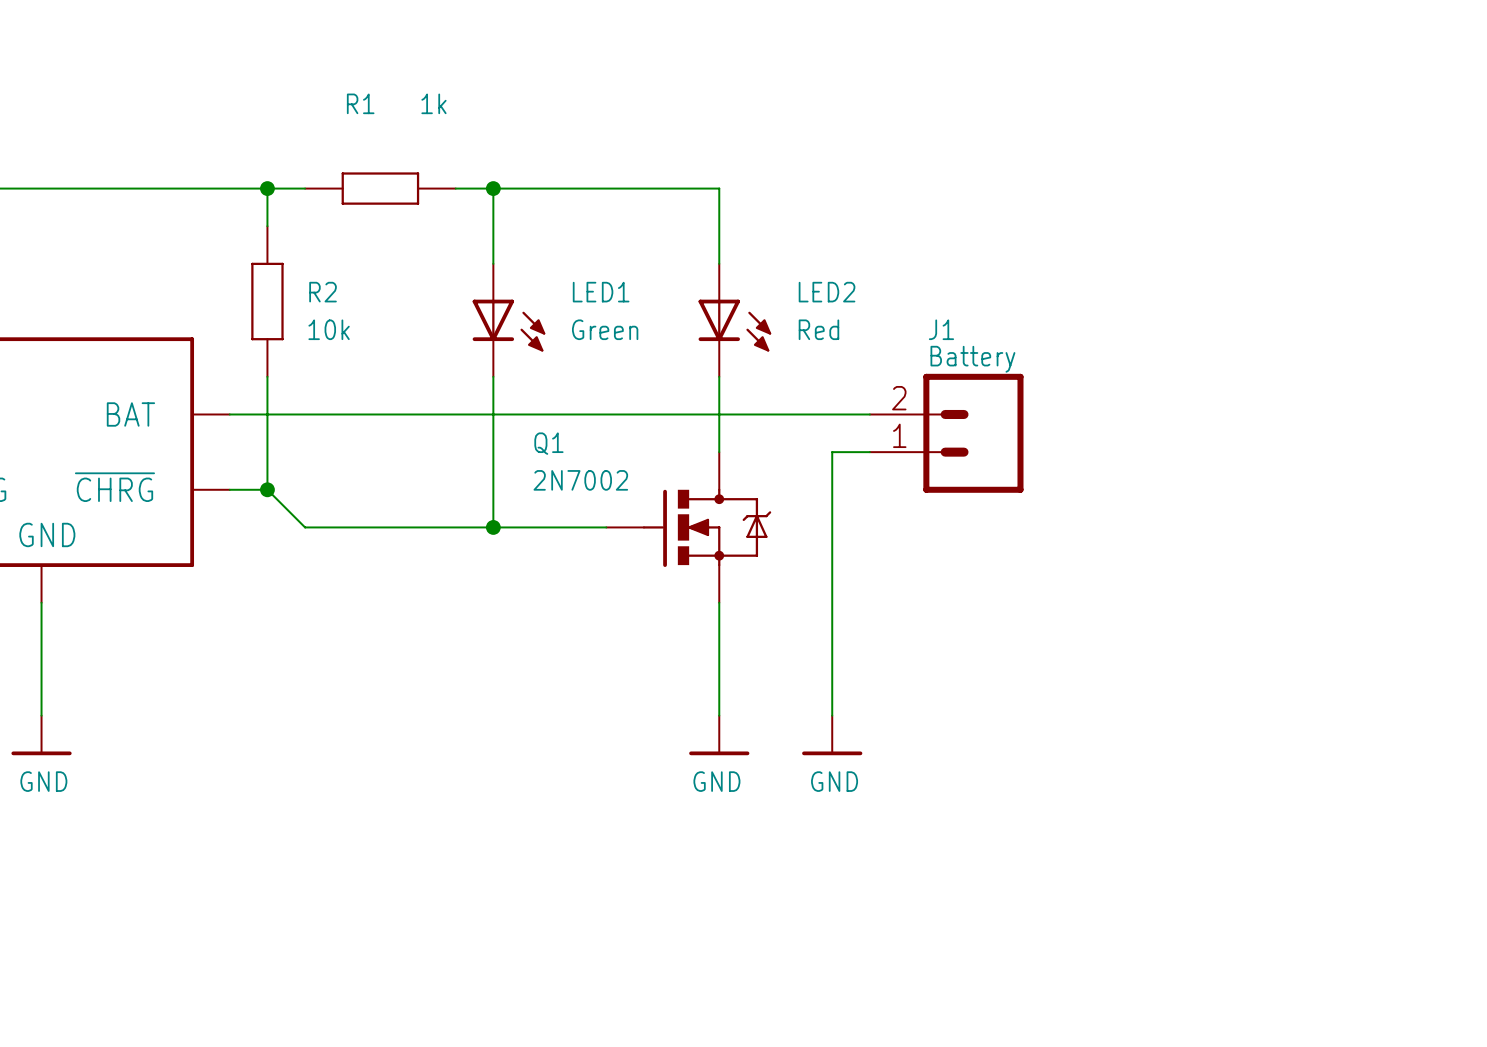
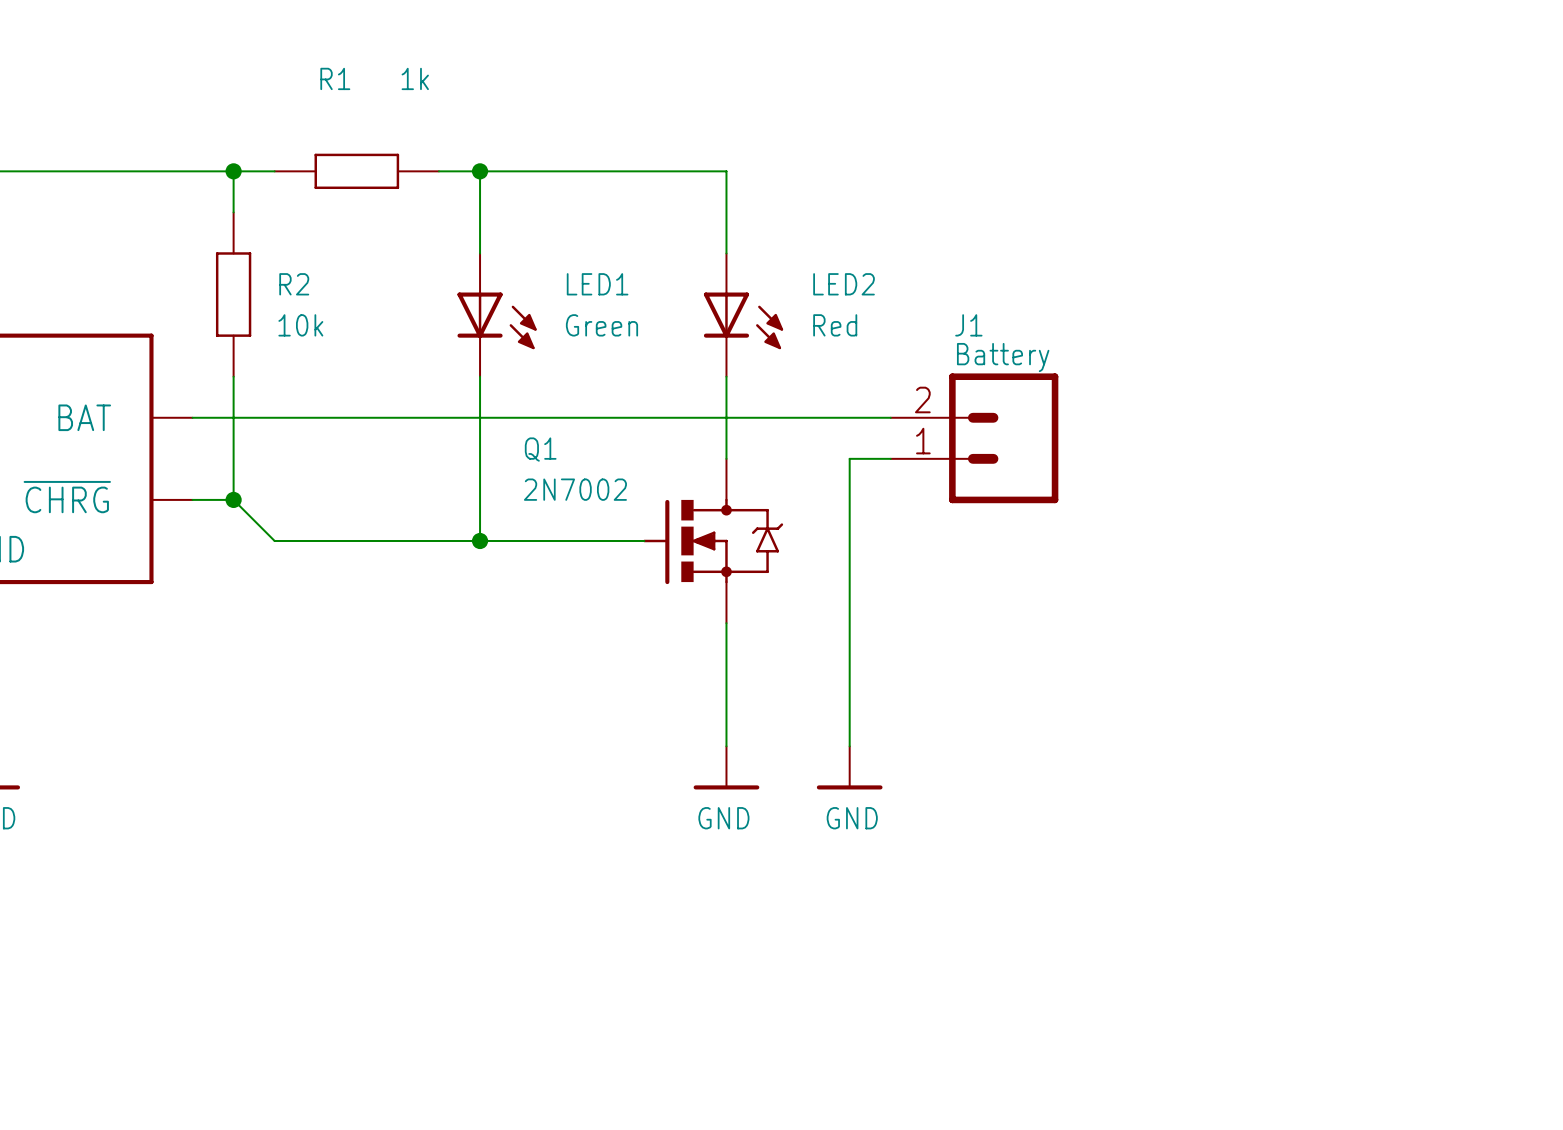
Q1 symbol: [606, 452, 772, 603] -> [643, 458, 784, 624]

